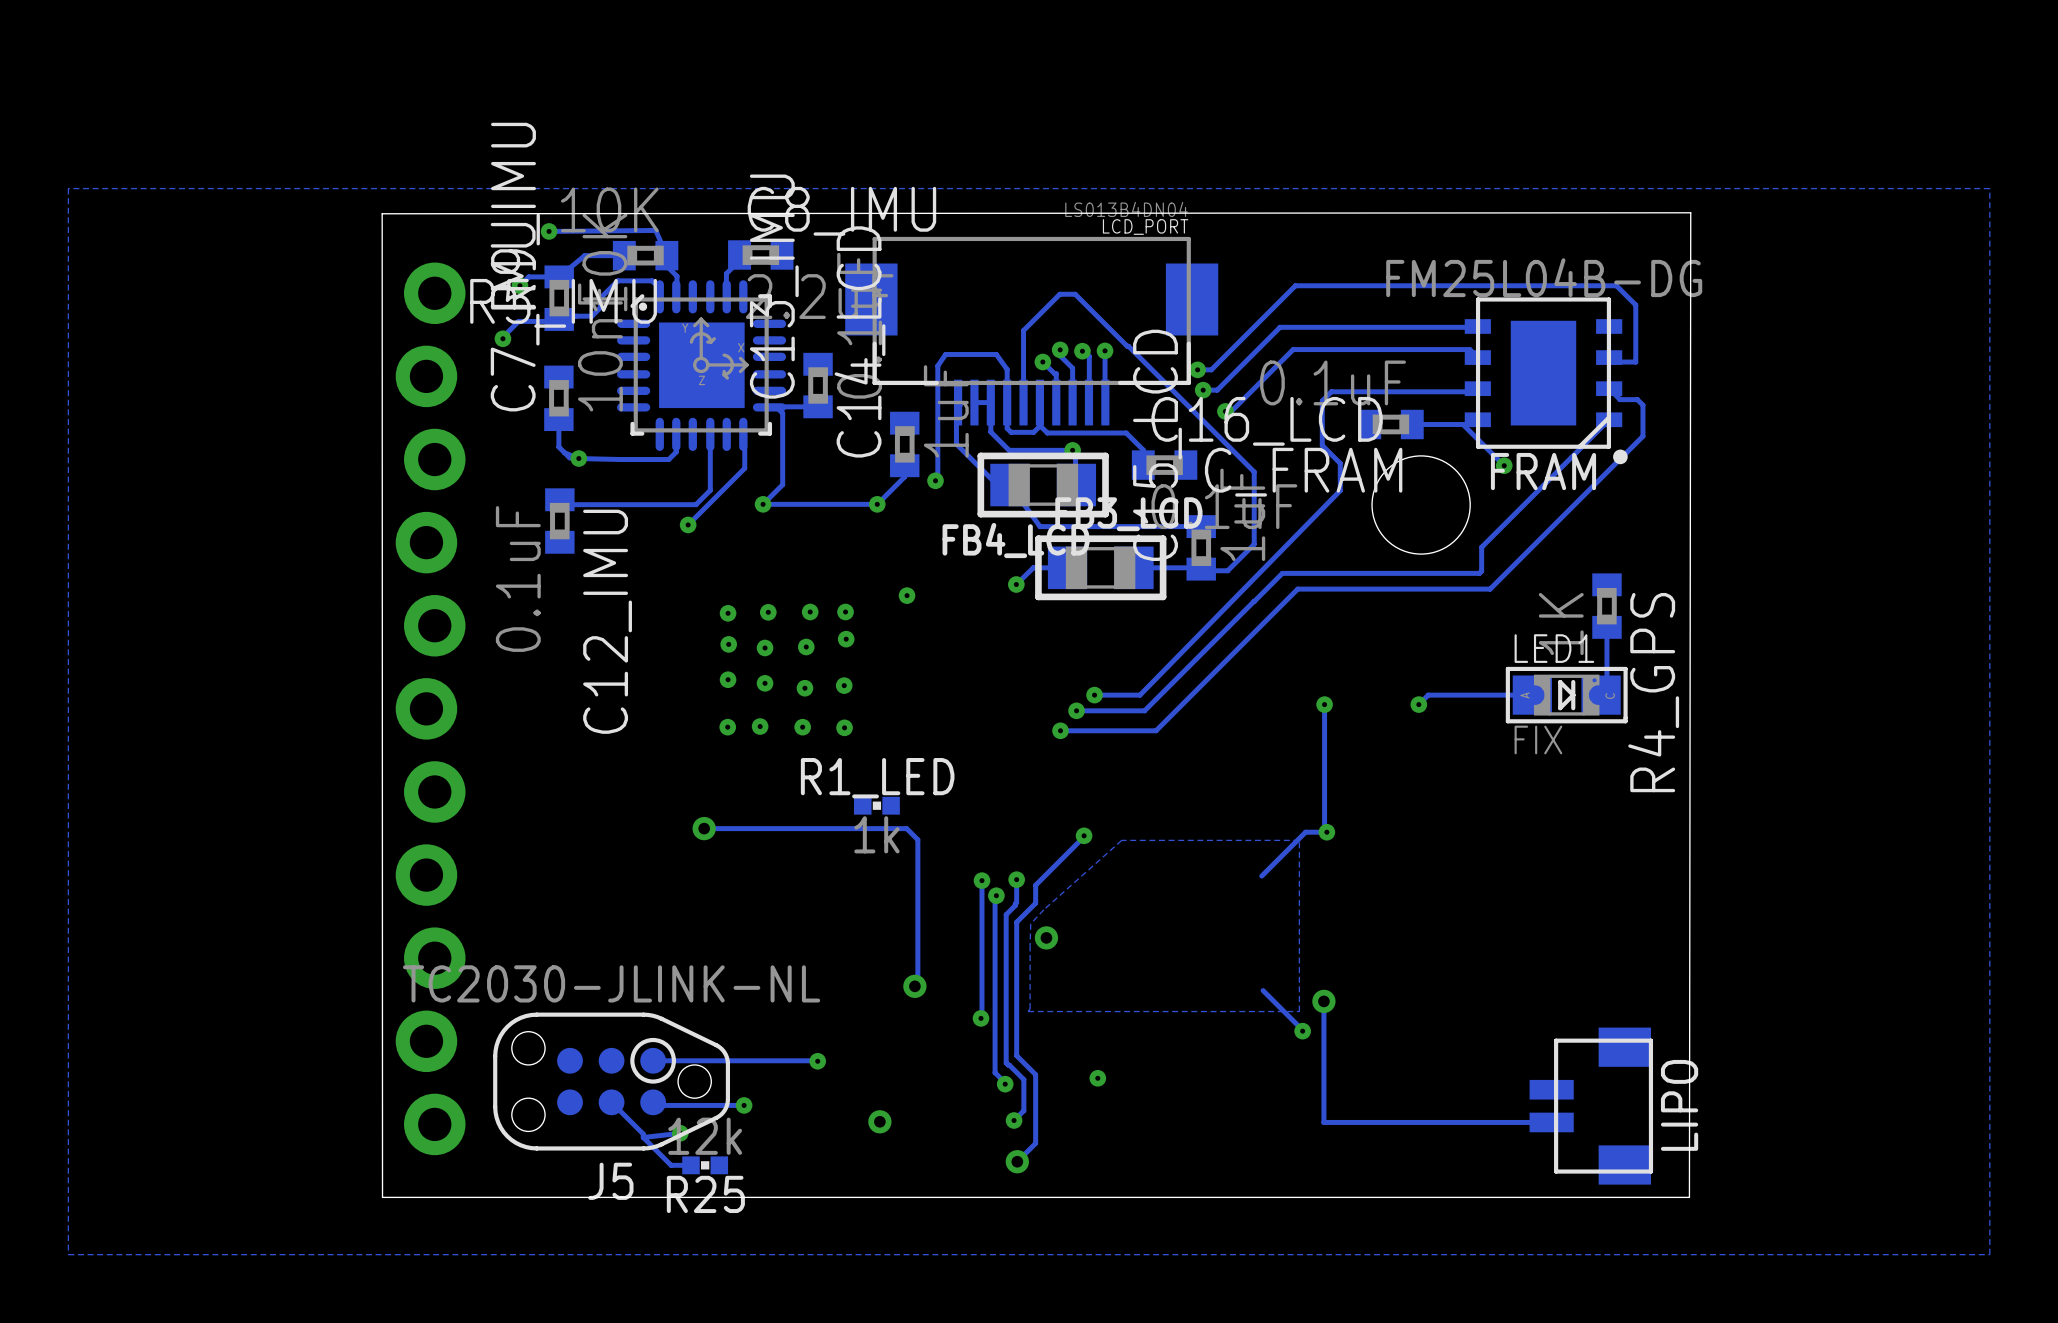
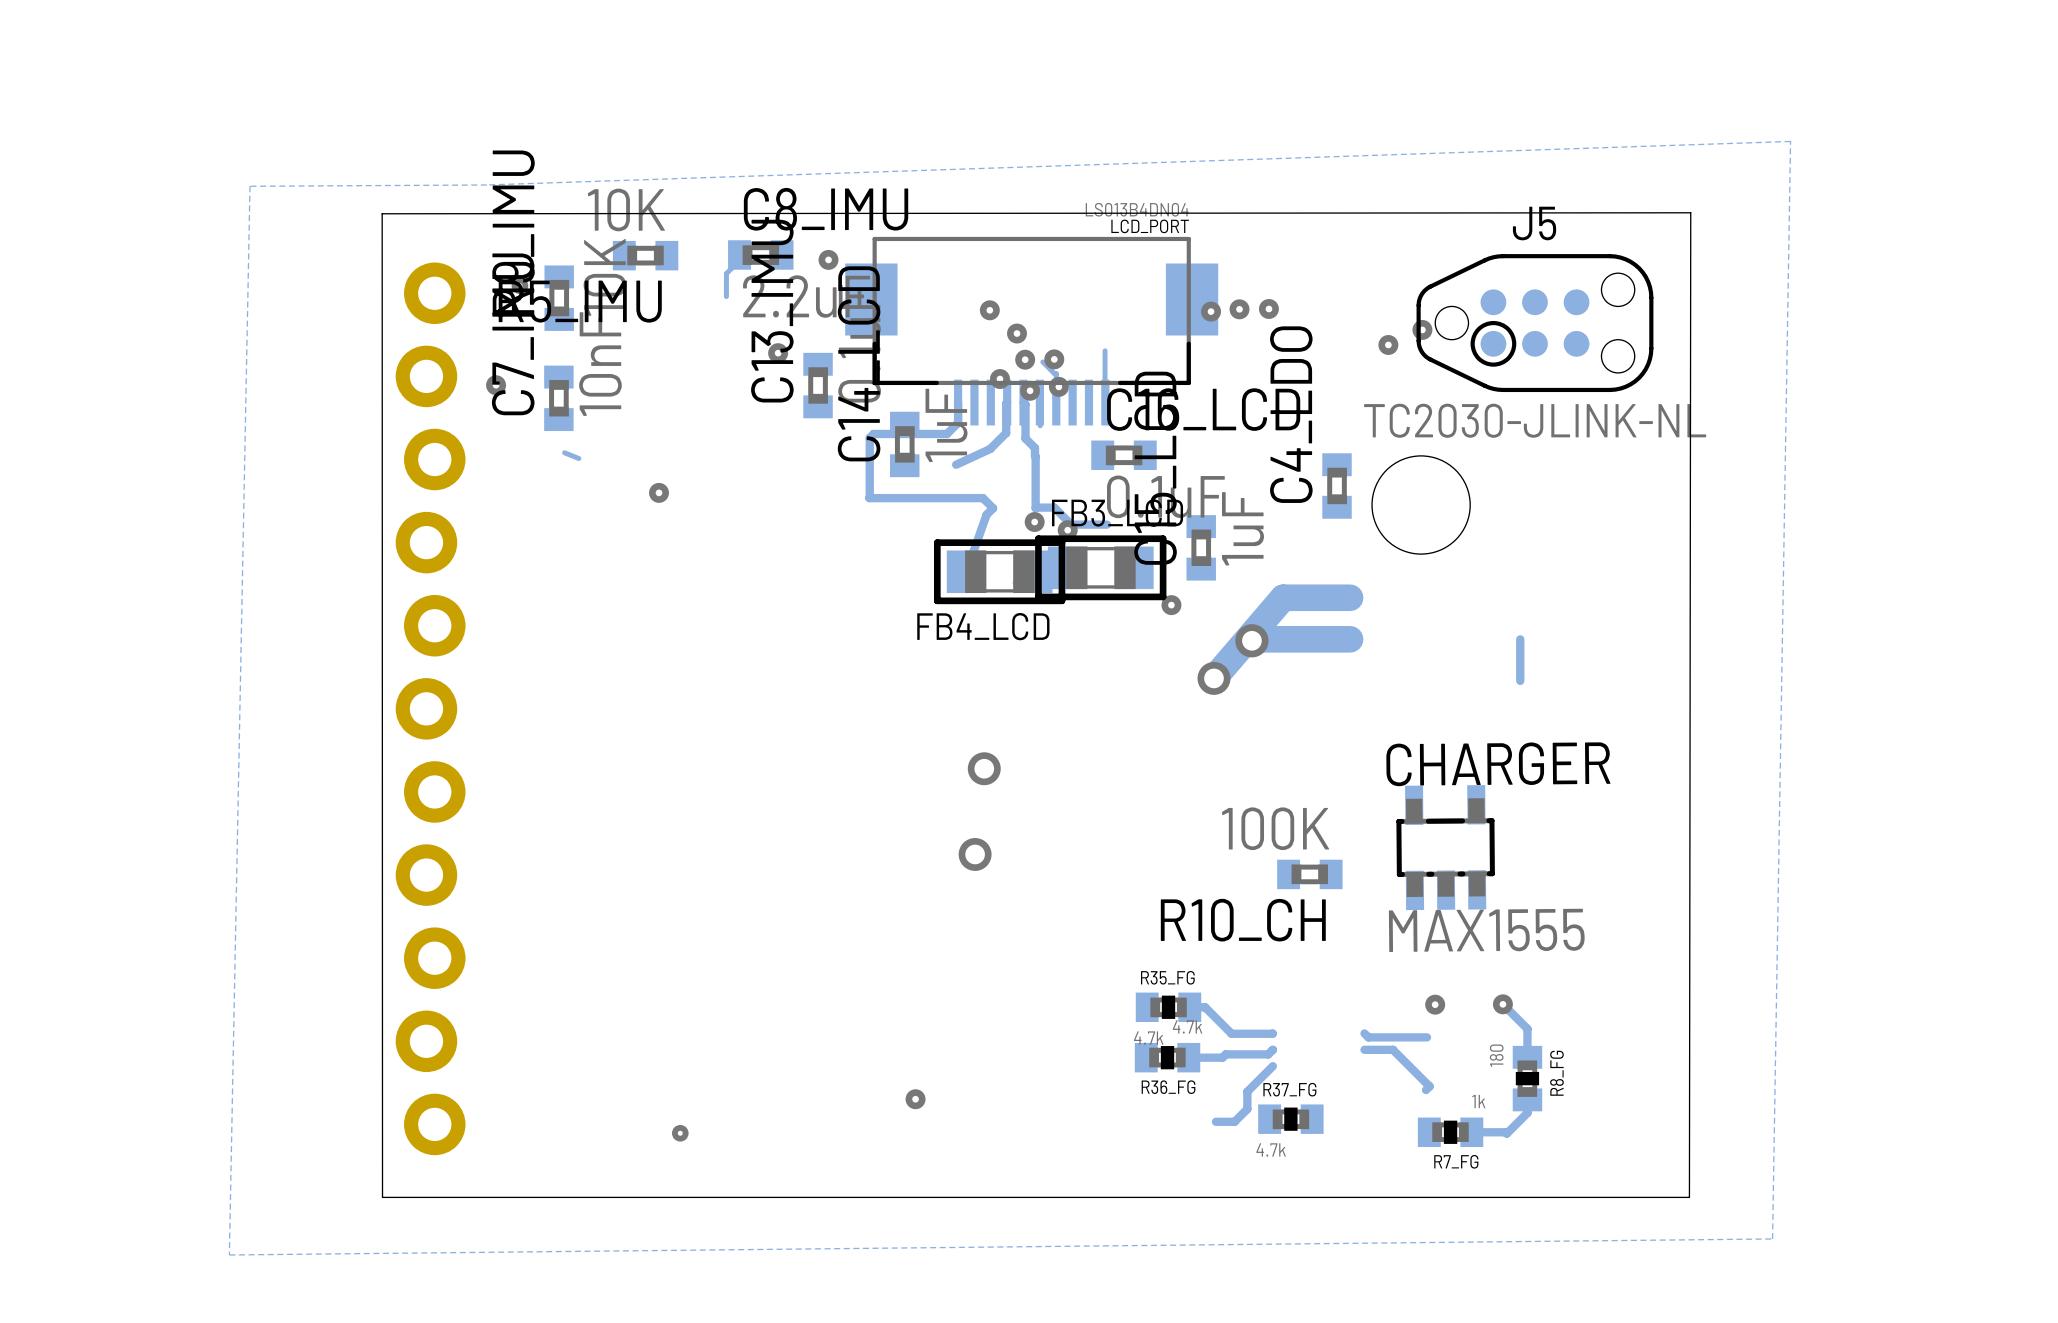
zone outline: (1989, 188) (68, 188) (68, 1254) (1989, 1254) (1989, 188) -> (1790, 141) (1772, 1238) (229, 1254) (249, 186) (486, 184) (1790, 141)
track: (549, 231) (655, 230) (666, 255) (666, 266) (677, 276) (676, 296) -> none
via: (549, 231) -> none
track: (624, 255) (584, 255) (559, 276) (528, 276) (519, 285) -> none
via: none -> (828, 259)
track: (659, 296) (659, 288) (652, 280) (617, 280) (600, 298) (600, 307) (591, 316) (575, 316) (557, 321) (518, 321) (502, 338) -> none
via: none -> (1268, 308)
via: none -> (1239, 309)
via: none -> (989, 310)
via: none -> (1211, 311)
track: (1477, 326) (1280, 327) (1217, 390) (1203, 390) -> none
via: none -> (1422, 329)
via: none -> (1016, 333)
via: (502, 338) -> none
via: none -> (1388, 344)
track: (1060, 349) (1060, 355) (1072, 368) (1072, 402) -> none
via: (1060, 349) -> none
via: (1105, 350) -> none
track: (1082, 351) (1089, 356) (1089, 402) -> none
via: (1082, 351) -> none
via: none -> (778, 353)
track: (1477, 357) (1469, 349) (1293, 349) (1231, 411) (1225, 411) -> none
track: (1609, 357) (1613, 362) (1635, 362) (1635, 305) (1616, 285) (1295, 285) (1211, 369) (1197, 369) -> none
via: none -> (1025, 359)
via: none -> (1054, 359)
via: (1042, 362) -> none
part: (701, 365) -> none
via: (1197, 369) -> none
via: none -> (999, 379)
FRAM: FM25L04B-DG (1546, 380) -> none
via: none -> (496, 385)
via: none -> (1058, 386)
track: (1477, 388) (1474, 391) (1331, 391) (1322, 400) (1322, 445) (1340, 463) (1340, 490) (1140, 695) (1094, 695) -> none
track: (1609, 388) (1620, 399) (1637, 399) (1642, 405) (1642, 436) (1490, 589) (1297, 589) (1156, 730) (1060, 730) -> none
via: none -> (1030, 390)
via: (1203, 390) -> none
track: none -> (958, 402) (958, 422) (946, 433) (873, 433) (869, 437) (869, 497)
track: (974, 402) (990, 402) (990, 432) (1009, 450) (1072, 450) (1075, 453) (1076, 485) -> none
track: (1023, 402) (1023, 330) (1059, 294) (1075, 294) (1254, 471) (1254, 544) (1227, 570) (1202, 570) (1199, 567) (1134, 567) -> (1023, 402) (1025, 404) (1025, 438) (1034, 448) (1035, 508) (1054, 507) (1071, 524) (1107, 524)
track: none -> (1007, 403) (1006, 403) (1006, 433) (990, 449) (956, 464)
track: (960, 404) (958, 402) (956, 404) (956, 444) (997, 485) (1009, 485) (1040, 526) (1201, 526) -> none
track: (818, 406) (769, 407) (776, 407) (782, 413) (782, 484) (763, 504) (877, 504) (904, 476) (904, 465) -> none
via: (1225, 411) -> none
track: (558, 419) (558, 447) (569, 457) (668, 459) (676, 452) (676, 434) -> none
track: (1477, 419) (1473, 424) (1412, 424) -> none
track: (1609, 419) (1481, 547) (1481, 571) (1479, 573) (1282, 573) (1254, 601) -> none
C_FRAM: 0.1uF (1391, 424) -> none
track: (1463, 424) (1504, 465) -> none
track: (710, 434) (710, 490) (695, 504) (564, 504) (559, 499) -> none
track: (743, 434) (744, 468) (688, 524) -> none
via: (1072, 450) -> none
via: (578, 458) -> none
track: (1143, 465) (1143, 450) (1126, 433) (1047, 433) (1040, 425) (1033, 432) (1011, 432) (1007, 428) (1007, 369) (996, 354) (945, 354) (937, 365) (937, 478) (935, 480) -> none
C16_LCD position: (1164, 465) -> (1123, 455)
via: (1504, 465) -> none
via: (935, 480) -> none
FB4_LCD position: (1043, 485) -> (999, 571)
C4_LDO: none -> (1337, 486)
via: none -> (659, 492)
track: none -> (869, 498) (982, 498) (993, 508) (986, 514) (966, 571)
via: (763, 504) -> none
via: (877, 504) -> none
C12_IMU: 0.1uF (559, 521) -> none
via: none -> (1034, 522)
via: (688, 524) -> none
via: none -> (1067, 530)
via: (1016, 584) -> none
via: (907, 595) -> none
track: none -> (1350, 597) (1283, 597) (1213, 678)
track: (1253, 601) (1144, 710) (1076, 710) -> none
via: none -> (1171, 605)
R4_GPS: 1K (1606, 606) -> none
via: (810, 611) -> none
via: (845, 611) -> none
via: (768, 612) -> none
via: (728, 613) -> none
track: (1606, 627) (1606, 689) (1601, 695) -> none
via: (846, 639) -> none
track: none -> (1350, 639) (1251, 640)
track: none -> (1520, 639) (1520, 680)
via: none -> (1251, 640)
via: (728, 644) -> none
via: (765, 647) -> none
via: (806, 647) -> none
via: none -> (1213, 678)
via: (728, 679) -> none
via: (765, 683) -> none
via: (844, 685) -> none
via: (804, 688) -> none
via: (1094, 695) -> none
track: (1532, 695) (1428, 695) (1418, 704) -> none
LED1: FIX (1566, 695) -> none
track: (1324, 704) (1324, 829) (1326, 832) (1305, 832) (1261, 876) -> none
via: (1324, 704) -> none
via: (1418, 704) -> none
via: (1076, 710) -> none
via: (760, 726) -> none
via: (727, 727) -> none
via: (802, 727) -> none
via: (844, 727) -> none
via: (1060, 730) -> none
via: none -> (984, 768)
R1_LED: 1k (876, 805) -> none
track: (704, 828) (906, 828) (917, 839) (917, 983) (914, 986) -> none
via: (704, 828) -> none
via: (1326, 832) -> none
track: (1084, 835) (1035, 885) (1035, 903) (1016, 922) (1016, 1055) (1035, 1074) (1035, 1143) (1017, 1161) -> none
via: (1084, 835) -> none
zone outline: (1299, 840) (1299, 1011) (1028, 1011) (1030, 1009) (1030, 923) (1043, 909) (1121, 840) (1299, 840) -> none
CHARGER: none -> MAX1555 (1445, 847)
via: none -> (975, 854)
R10_CH: none -> 100K (1309, 874)
track: (1016, 879) (1016, 902) (1006, 914) (1006, 1062) (1023, 1079) (1023, 1110) (1014, 1120) -> none
via: (1016, 879) -> none
track: (981, 880) (981, 1018) -> none
via: (981, 880) -> none
track: (996, 895) (995, 1072) (1006, 1082) (1005, 1084) -> none
via: (996, 895) -> none
via: (1046, 937) -> none
via: (914, 986) -> none
track: (1263, 990) (1302, 1031) -> none
track: (1323, 1001) (1323, 1122) (1551, 1122) -> none
via: (1323, 1001) -> none
via: none -> (1435, 1004)
track: none -> (1502, 1004) (1527, 1028) (1527, 1057)
via: none -> (1502, 1004)
R35_FG: none -> 4.7k (1168, 1007)
track: none -> (1189, 1007) (1205, 1007) (1231, 1033) (1272, 1033)
via: (981, 1018) -> none
via: (1302, 1031) -> none
track: none -> (1364, 1033) (1368, 1037) (1427, 1037)
track: none -> (1272, 1049) (1268, 1054) (1225, 1054) (1222, 1057) (1188, 1057)
track: none -> (1364, 1049) (1392, 1049) (1429, 1086) (1426, 1090)
R36_FG: none -> 4.7k (1167, 1057)
track: (653, 1060) (817, 1061) -> none
via: (817, 1061) -> none
track: none -> (1272, 1066) (1247, 1091) (1247, 1109) (1234, 1121) (1215, 1121)
via: (1097, 1078) -> none
R8_FG: none -> 180 (1527, 1078)
J5 rotation: 0° (611, 1081) -> 180° (1534, 323)
J5 position: (611, 1081) -> (1534, 323)
via: (1005, 1084) -> none
via: none -> (915, 1099)
track: none -> (1527, 1099) (1527, 1112) (1506, 1133) (1471, 1132)
track: (611, 1102) (643, 1134) (643, 1137) -> none
track: (653, 1102) (656, 1105) (744, 1105) -> none
via: (744, 1105) -> none
LIPO: (1591, 1106) -> none
R37_FG: none -> 4.7k (1290, 1119)
via: (1014, 1120) -> none
via: (879, 1121) -> none
R7_FG: none -> 1k (1450, 1132)
track: (680, 1133) (643, 1137) -> none
track: (643, 1137) (671, 1165) (690, 1165) -> none
via: (1017, 1161) -> none
R25: 12k (705, 1165) -> none

